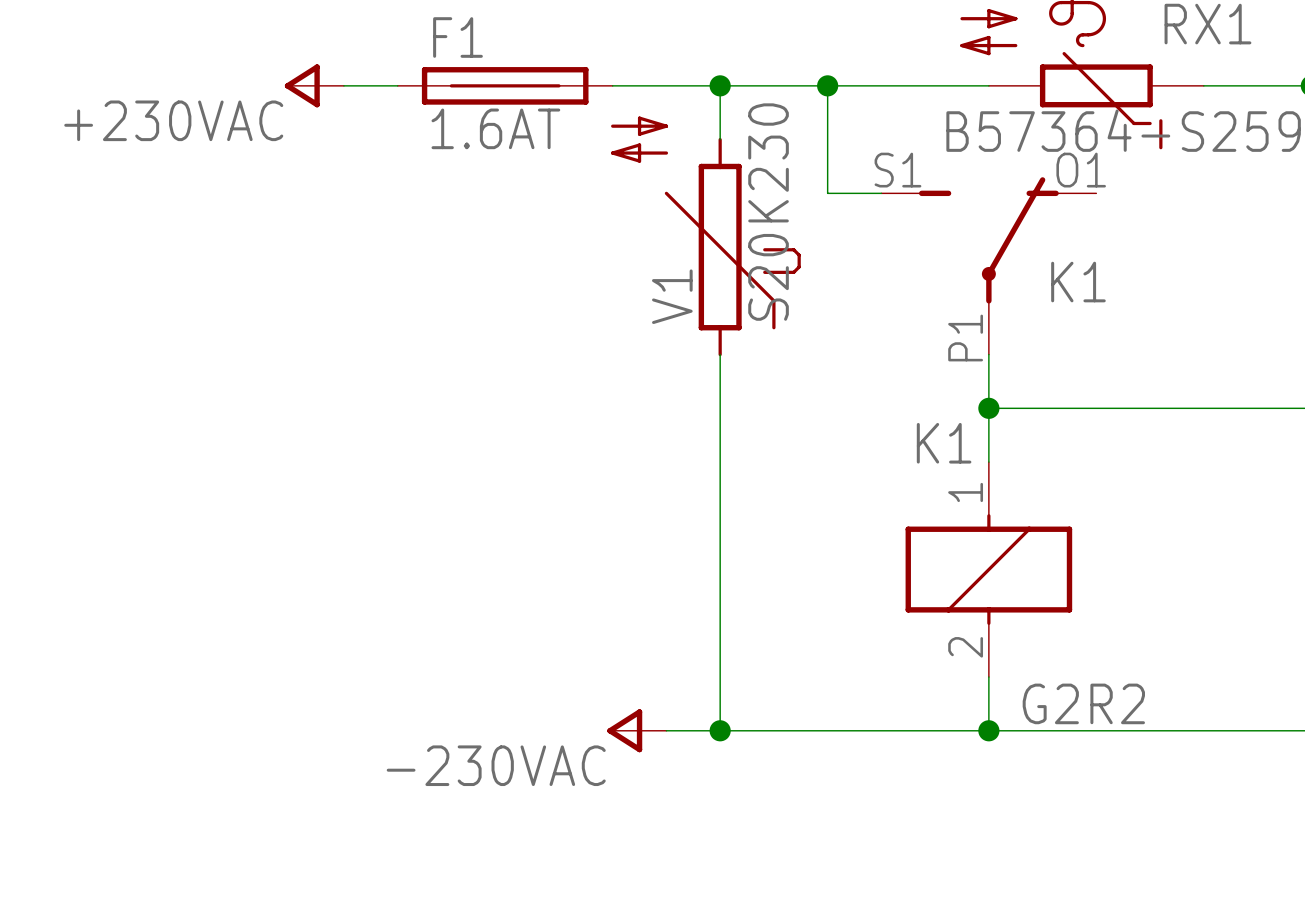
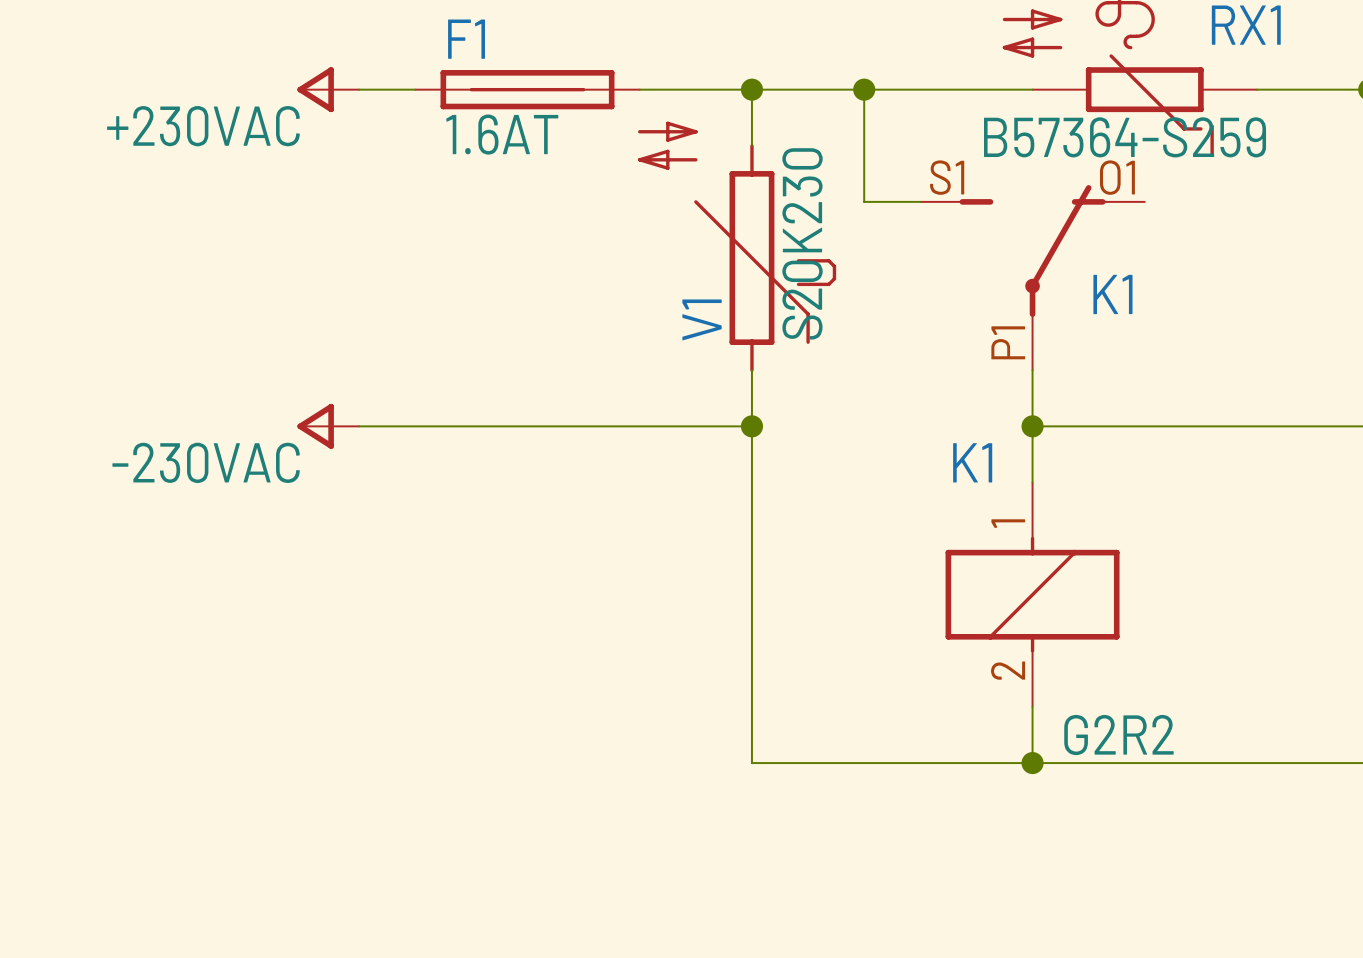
wire: none -> (359, 426) (751, 426)
junction: none -> (751, 426)
power symbol position: -230VAC (636, 730) -> -230VAC (328, 426)
wire: (666, 730) (720, 730) -> none
junction: (720, 730) -> none

